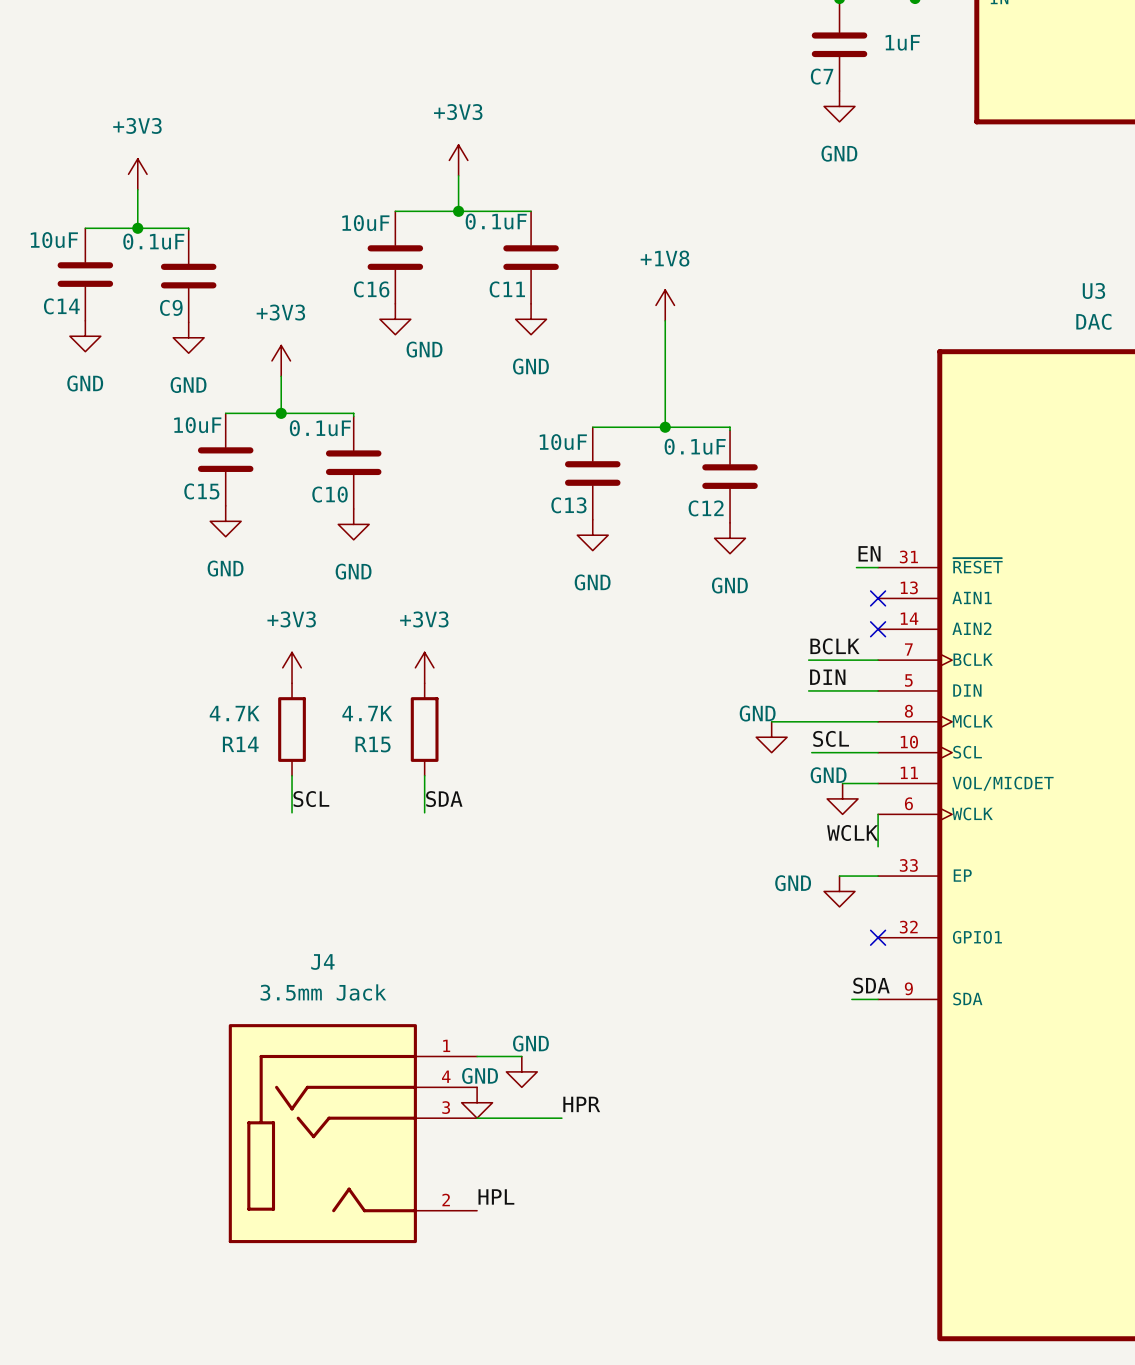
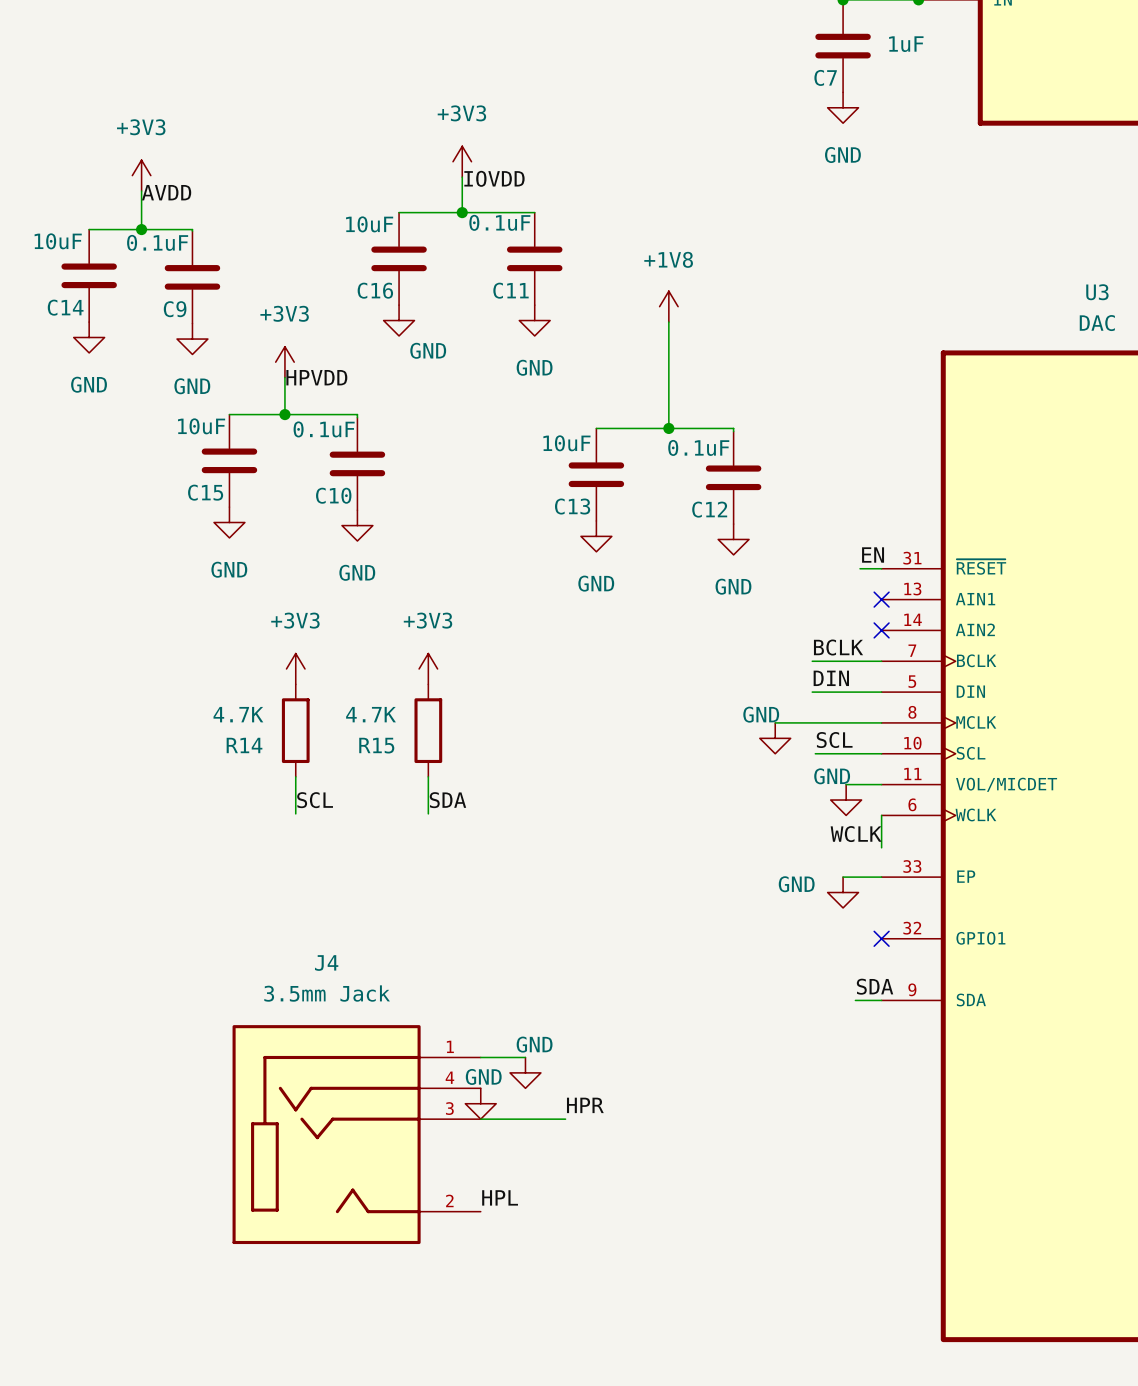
label: none -> IOVDD (494, 178)
label: none -> AVDD (166, 192)
label: none -> HPVDD (316, 377)

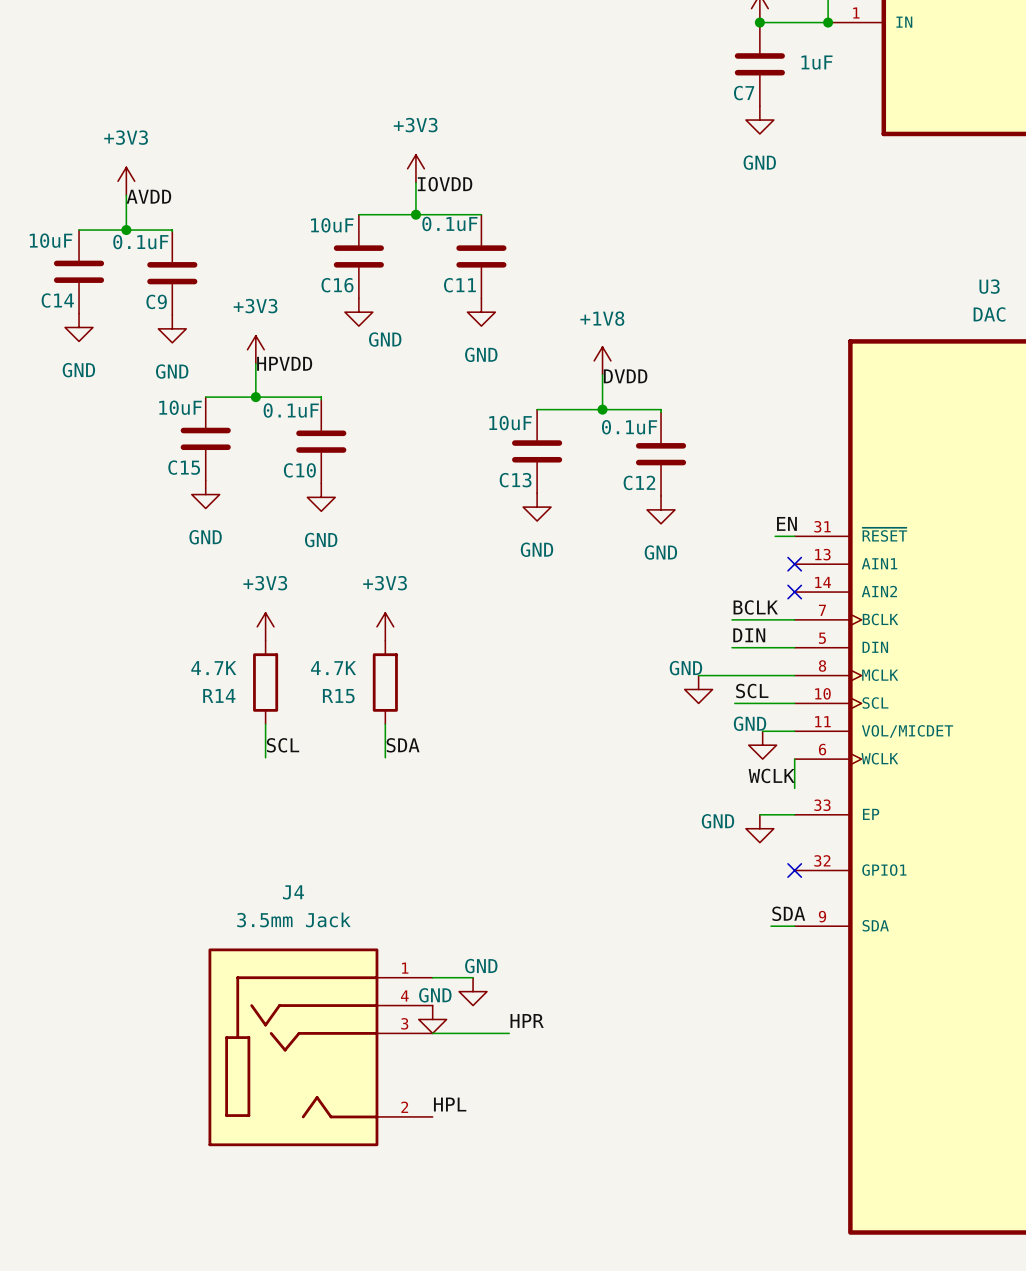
power symbol position: +1V8 (668, 306) -> +1V8 (602, 360)
wire: (668, 322) (668, 389) -> none
label: none -> DVDD (625, 376)

